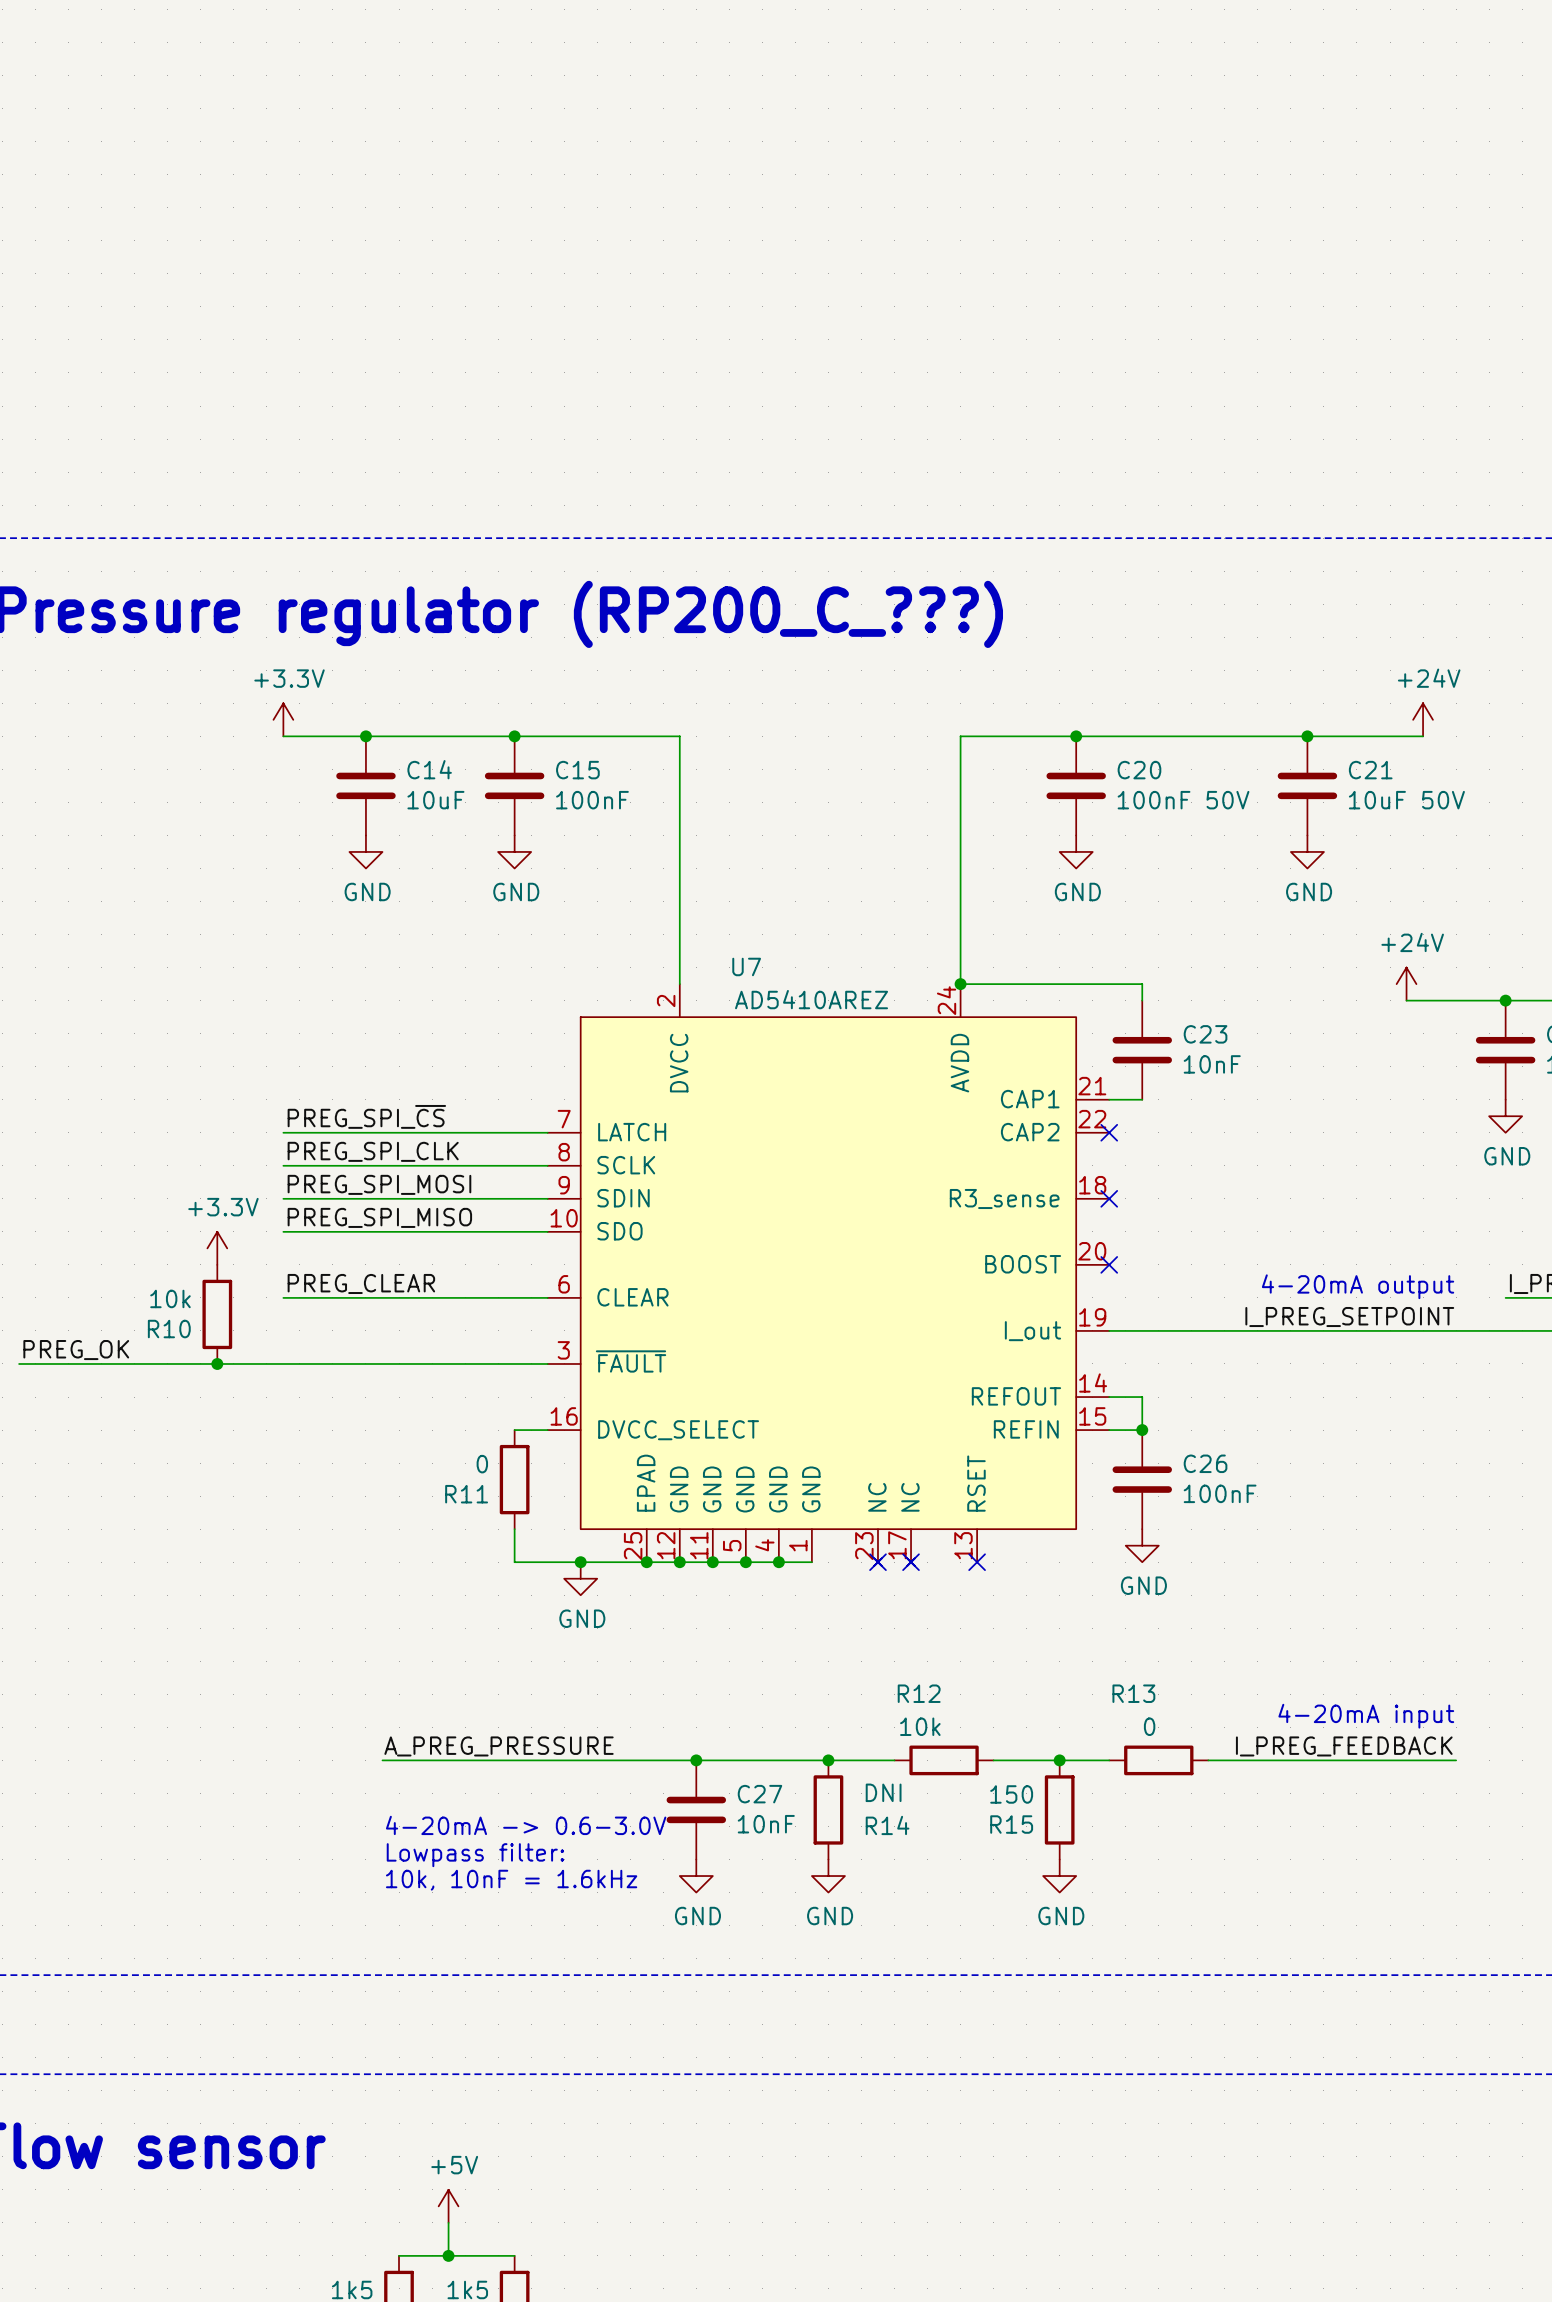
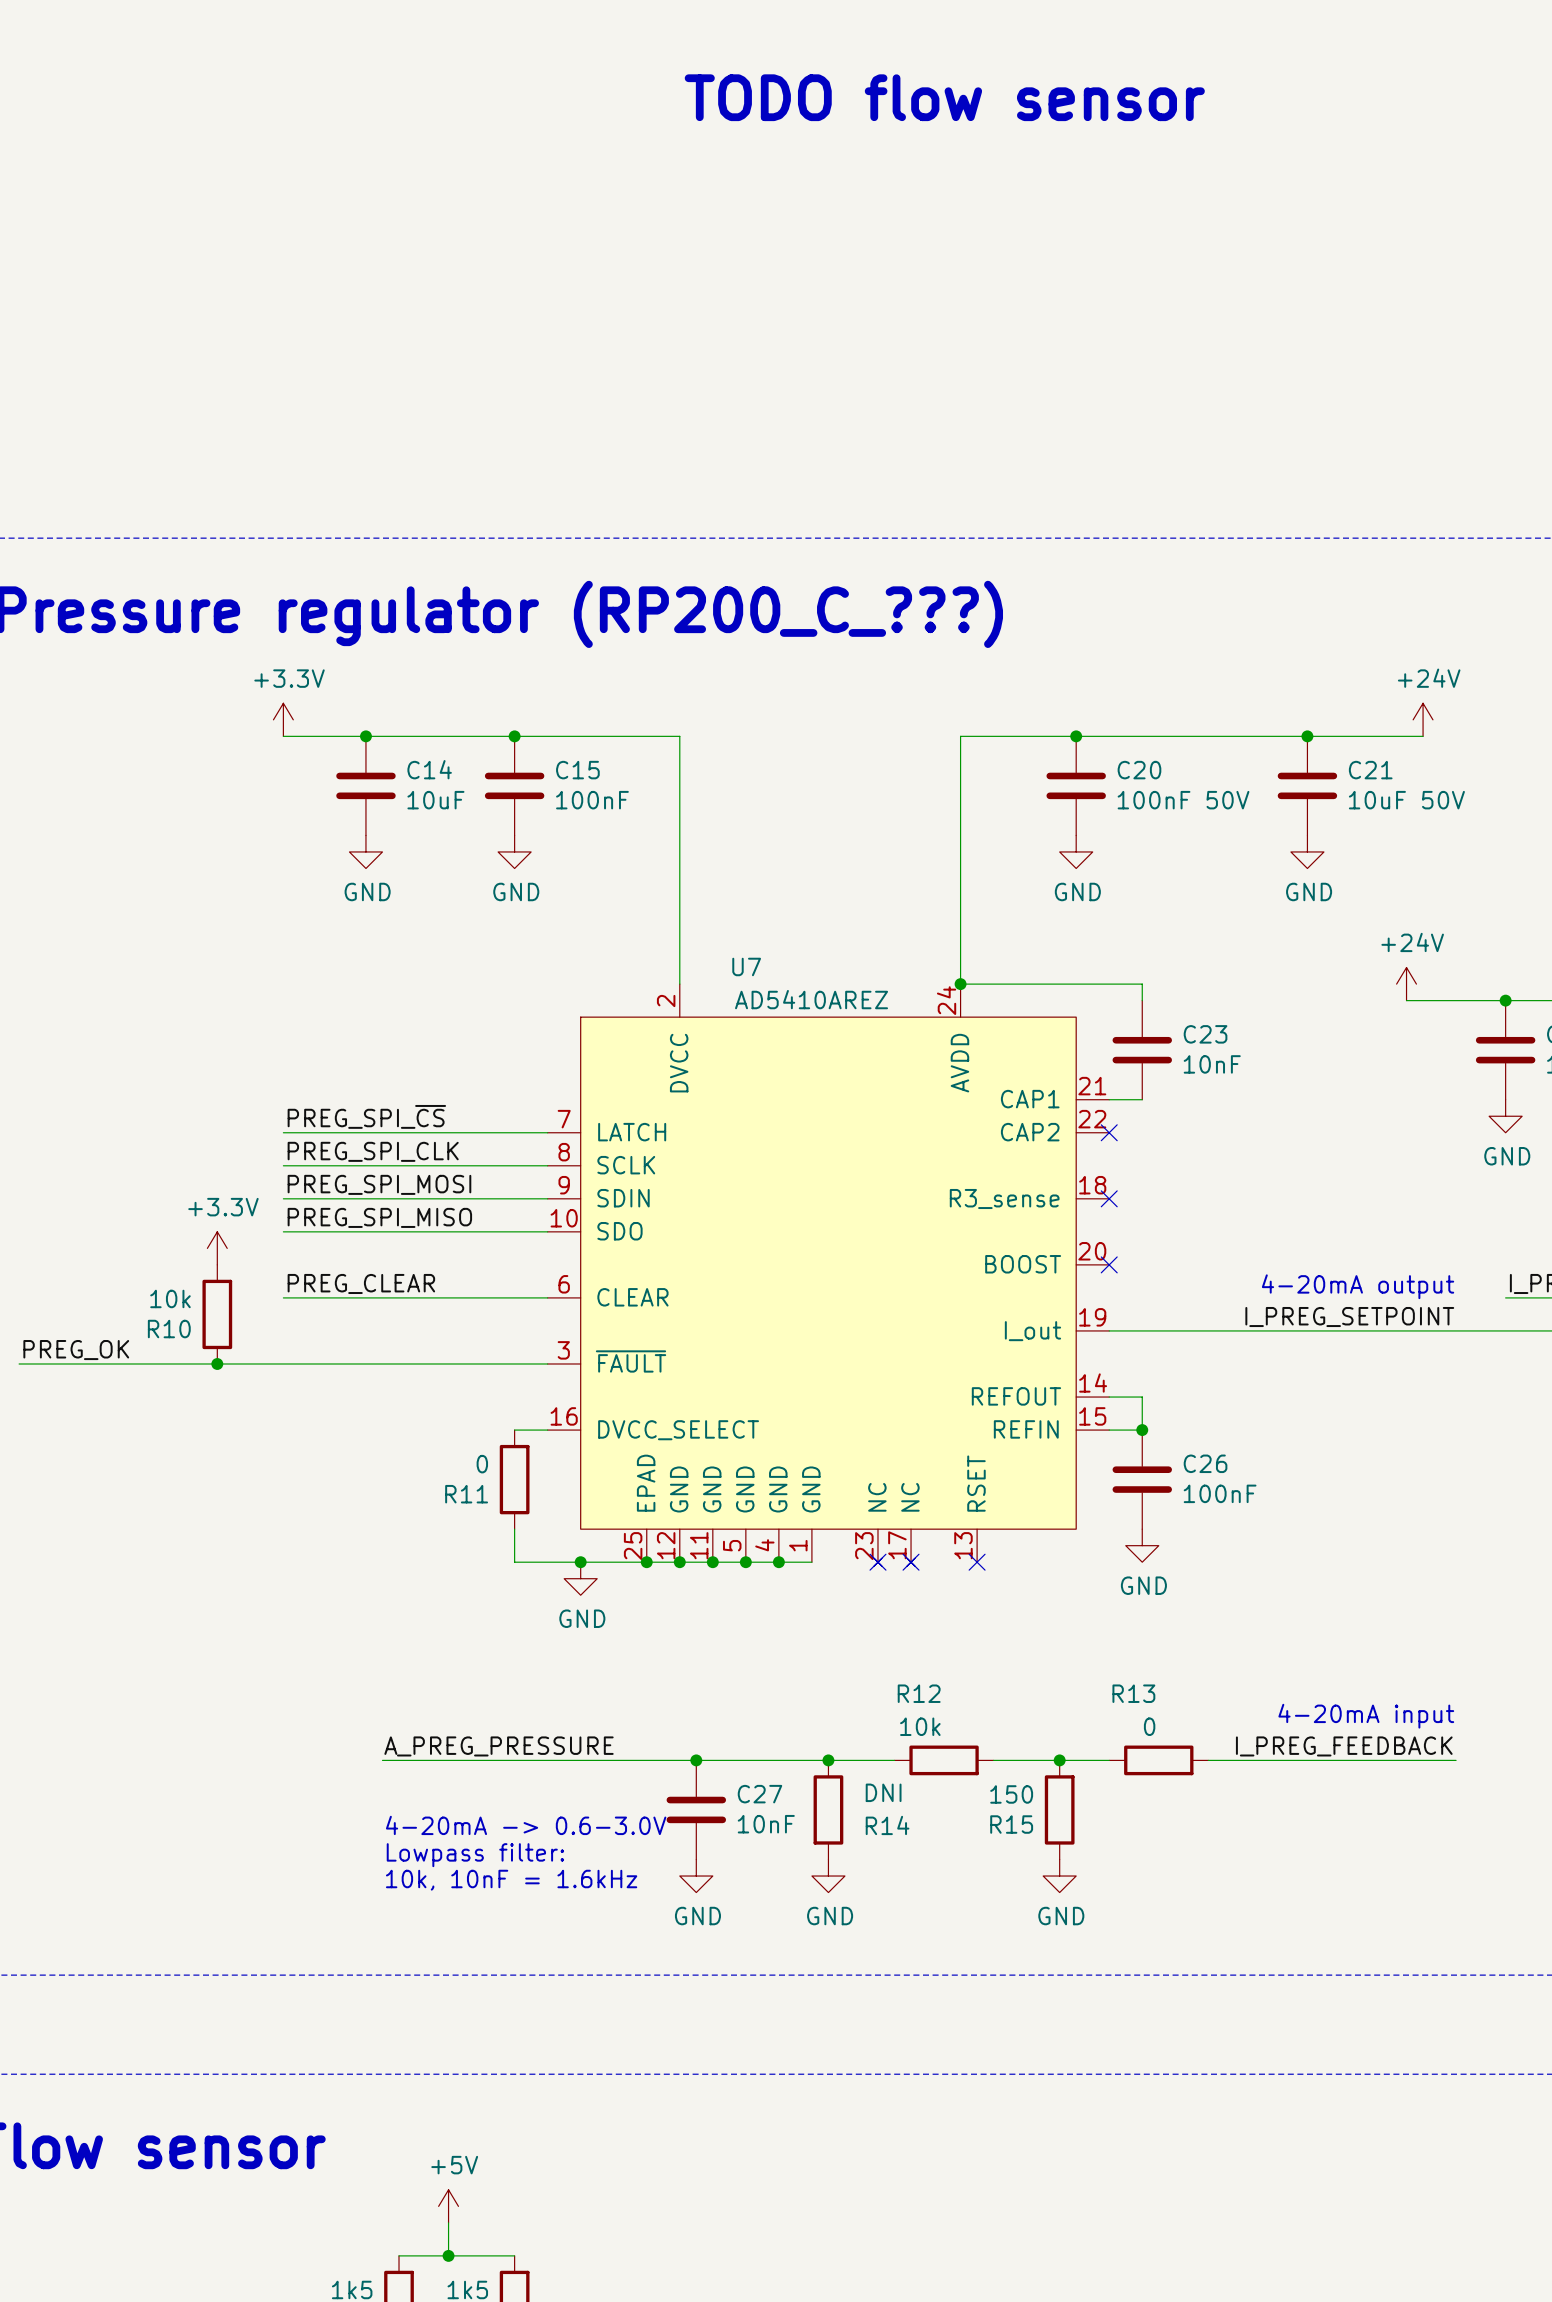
text: none -> TODO flow sensor (944, 97)

